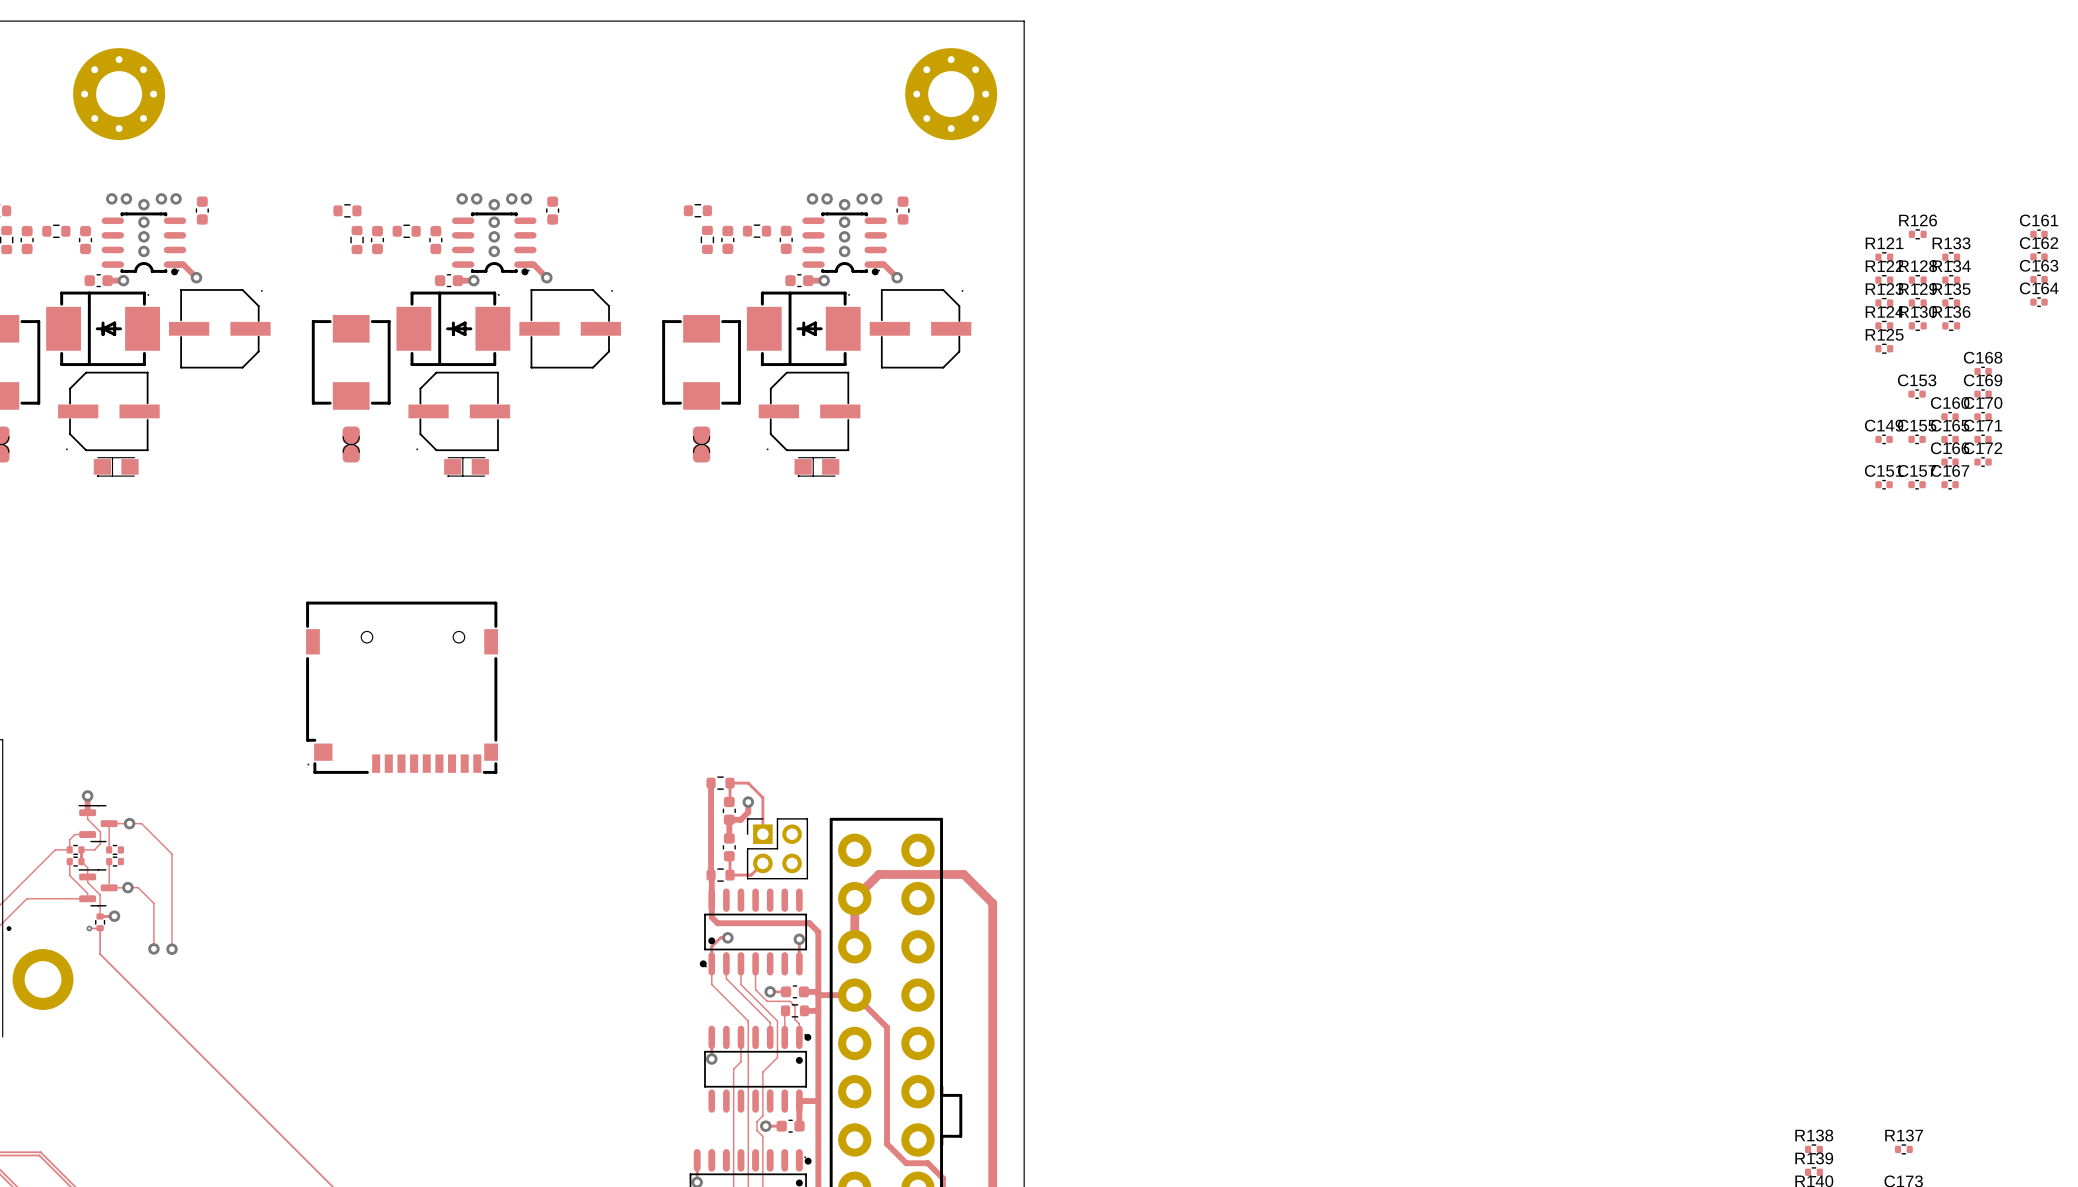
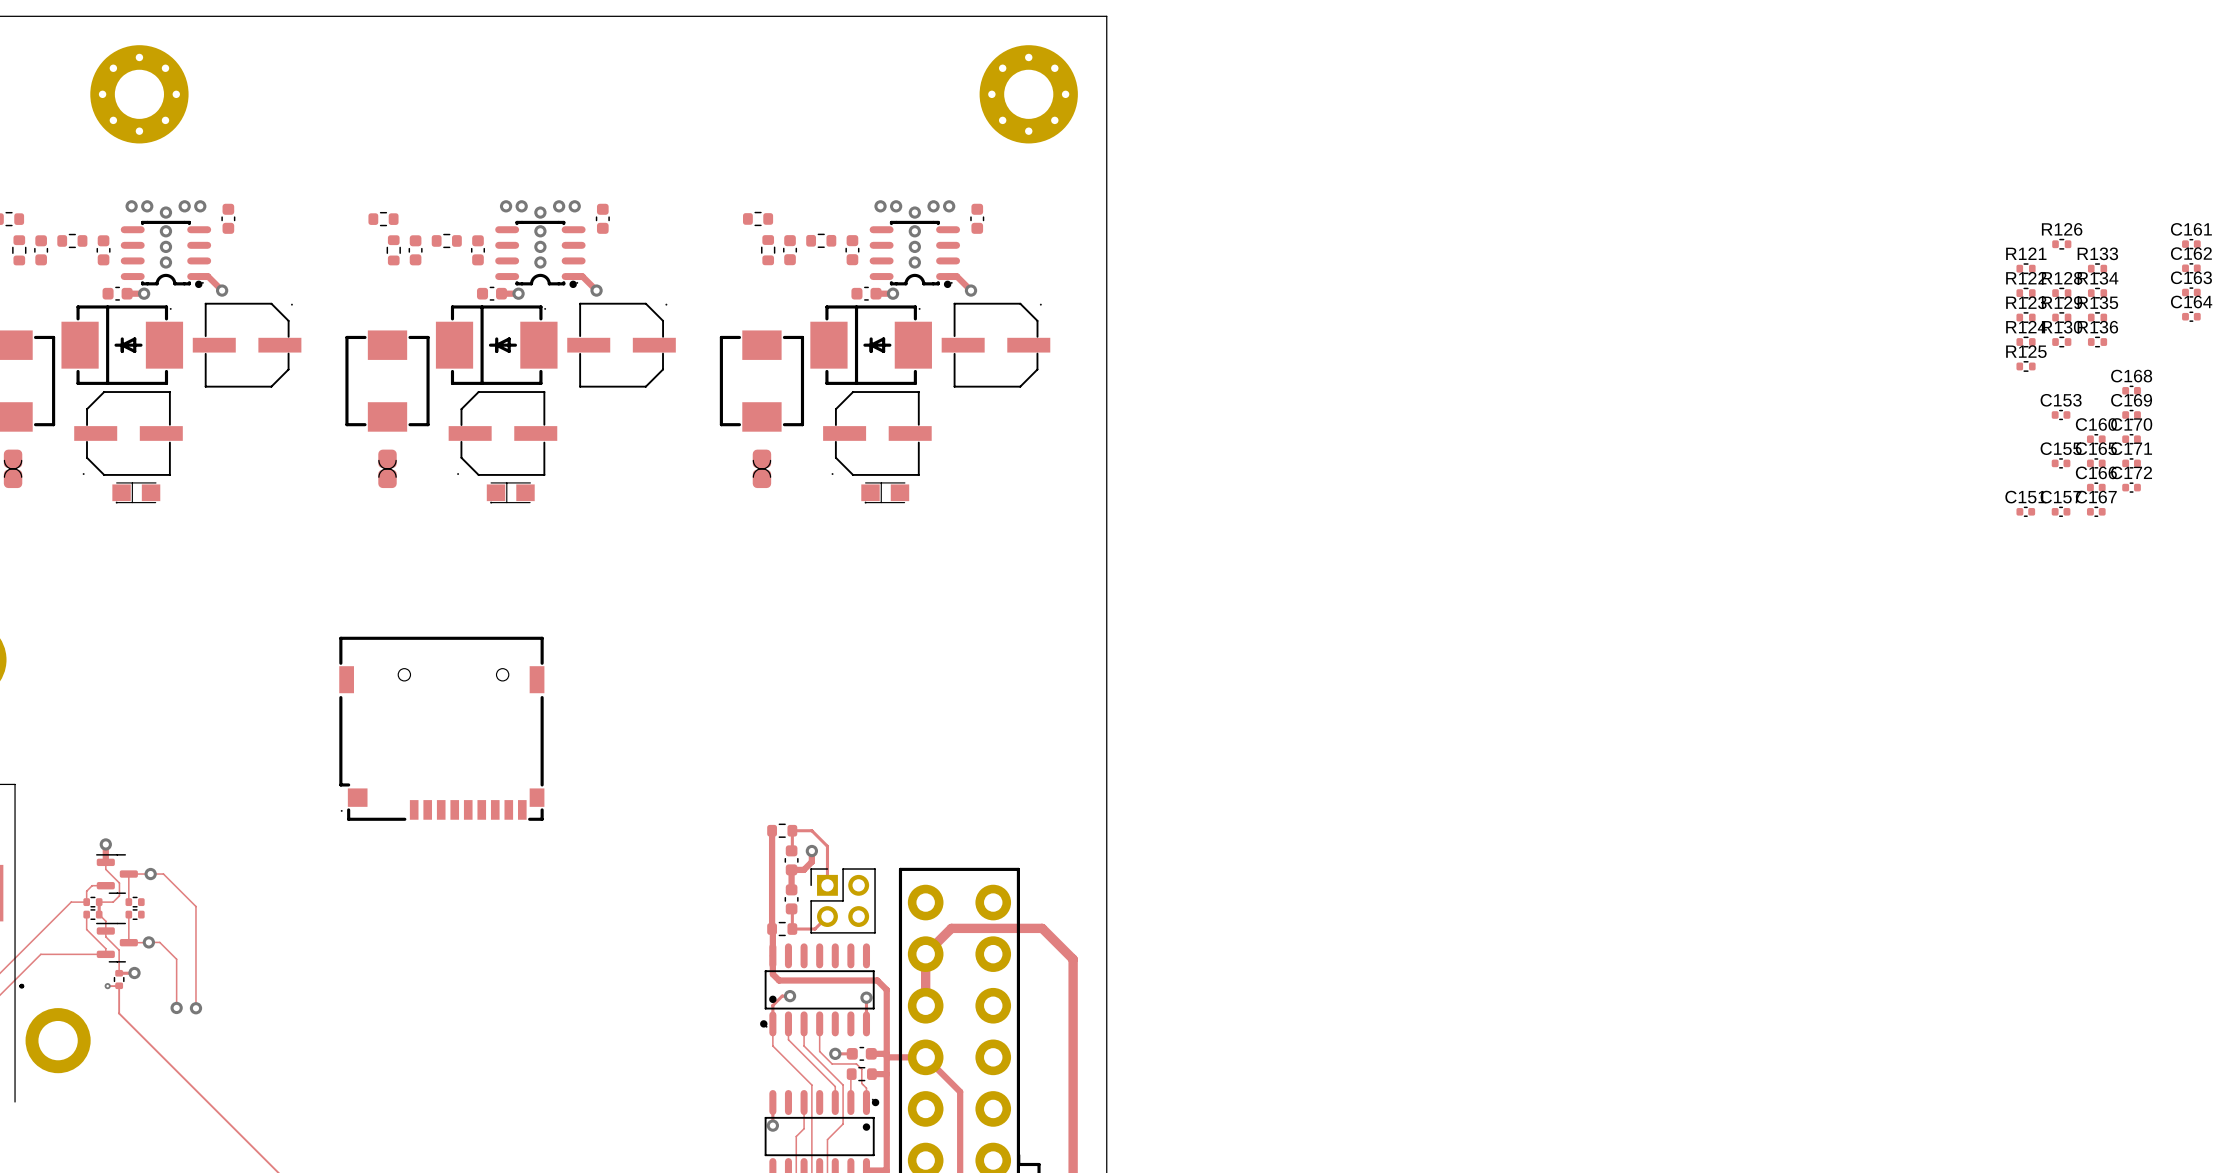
C149: (1884, 439) -> none

